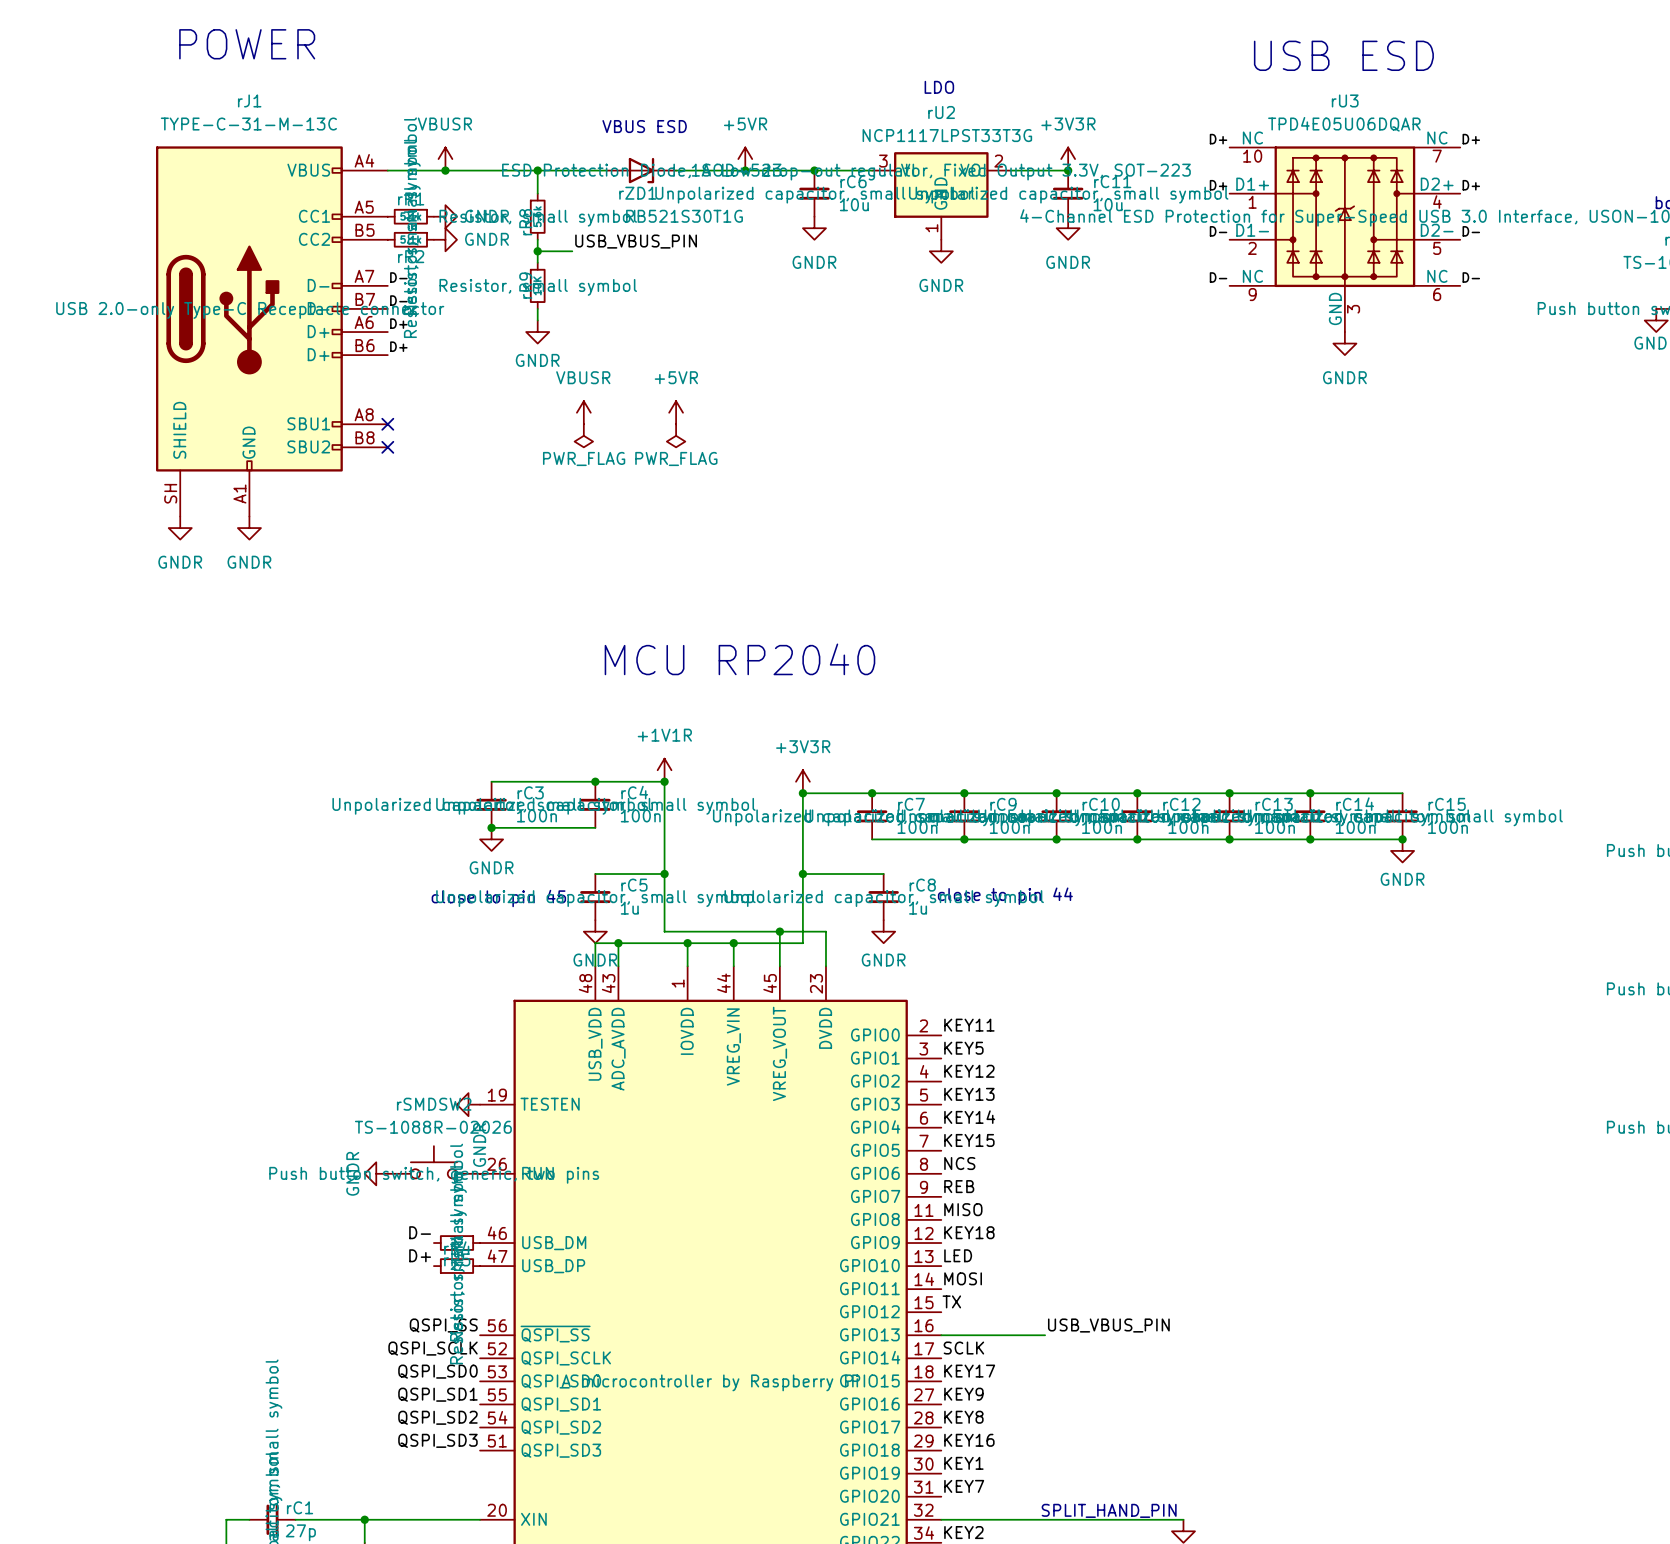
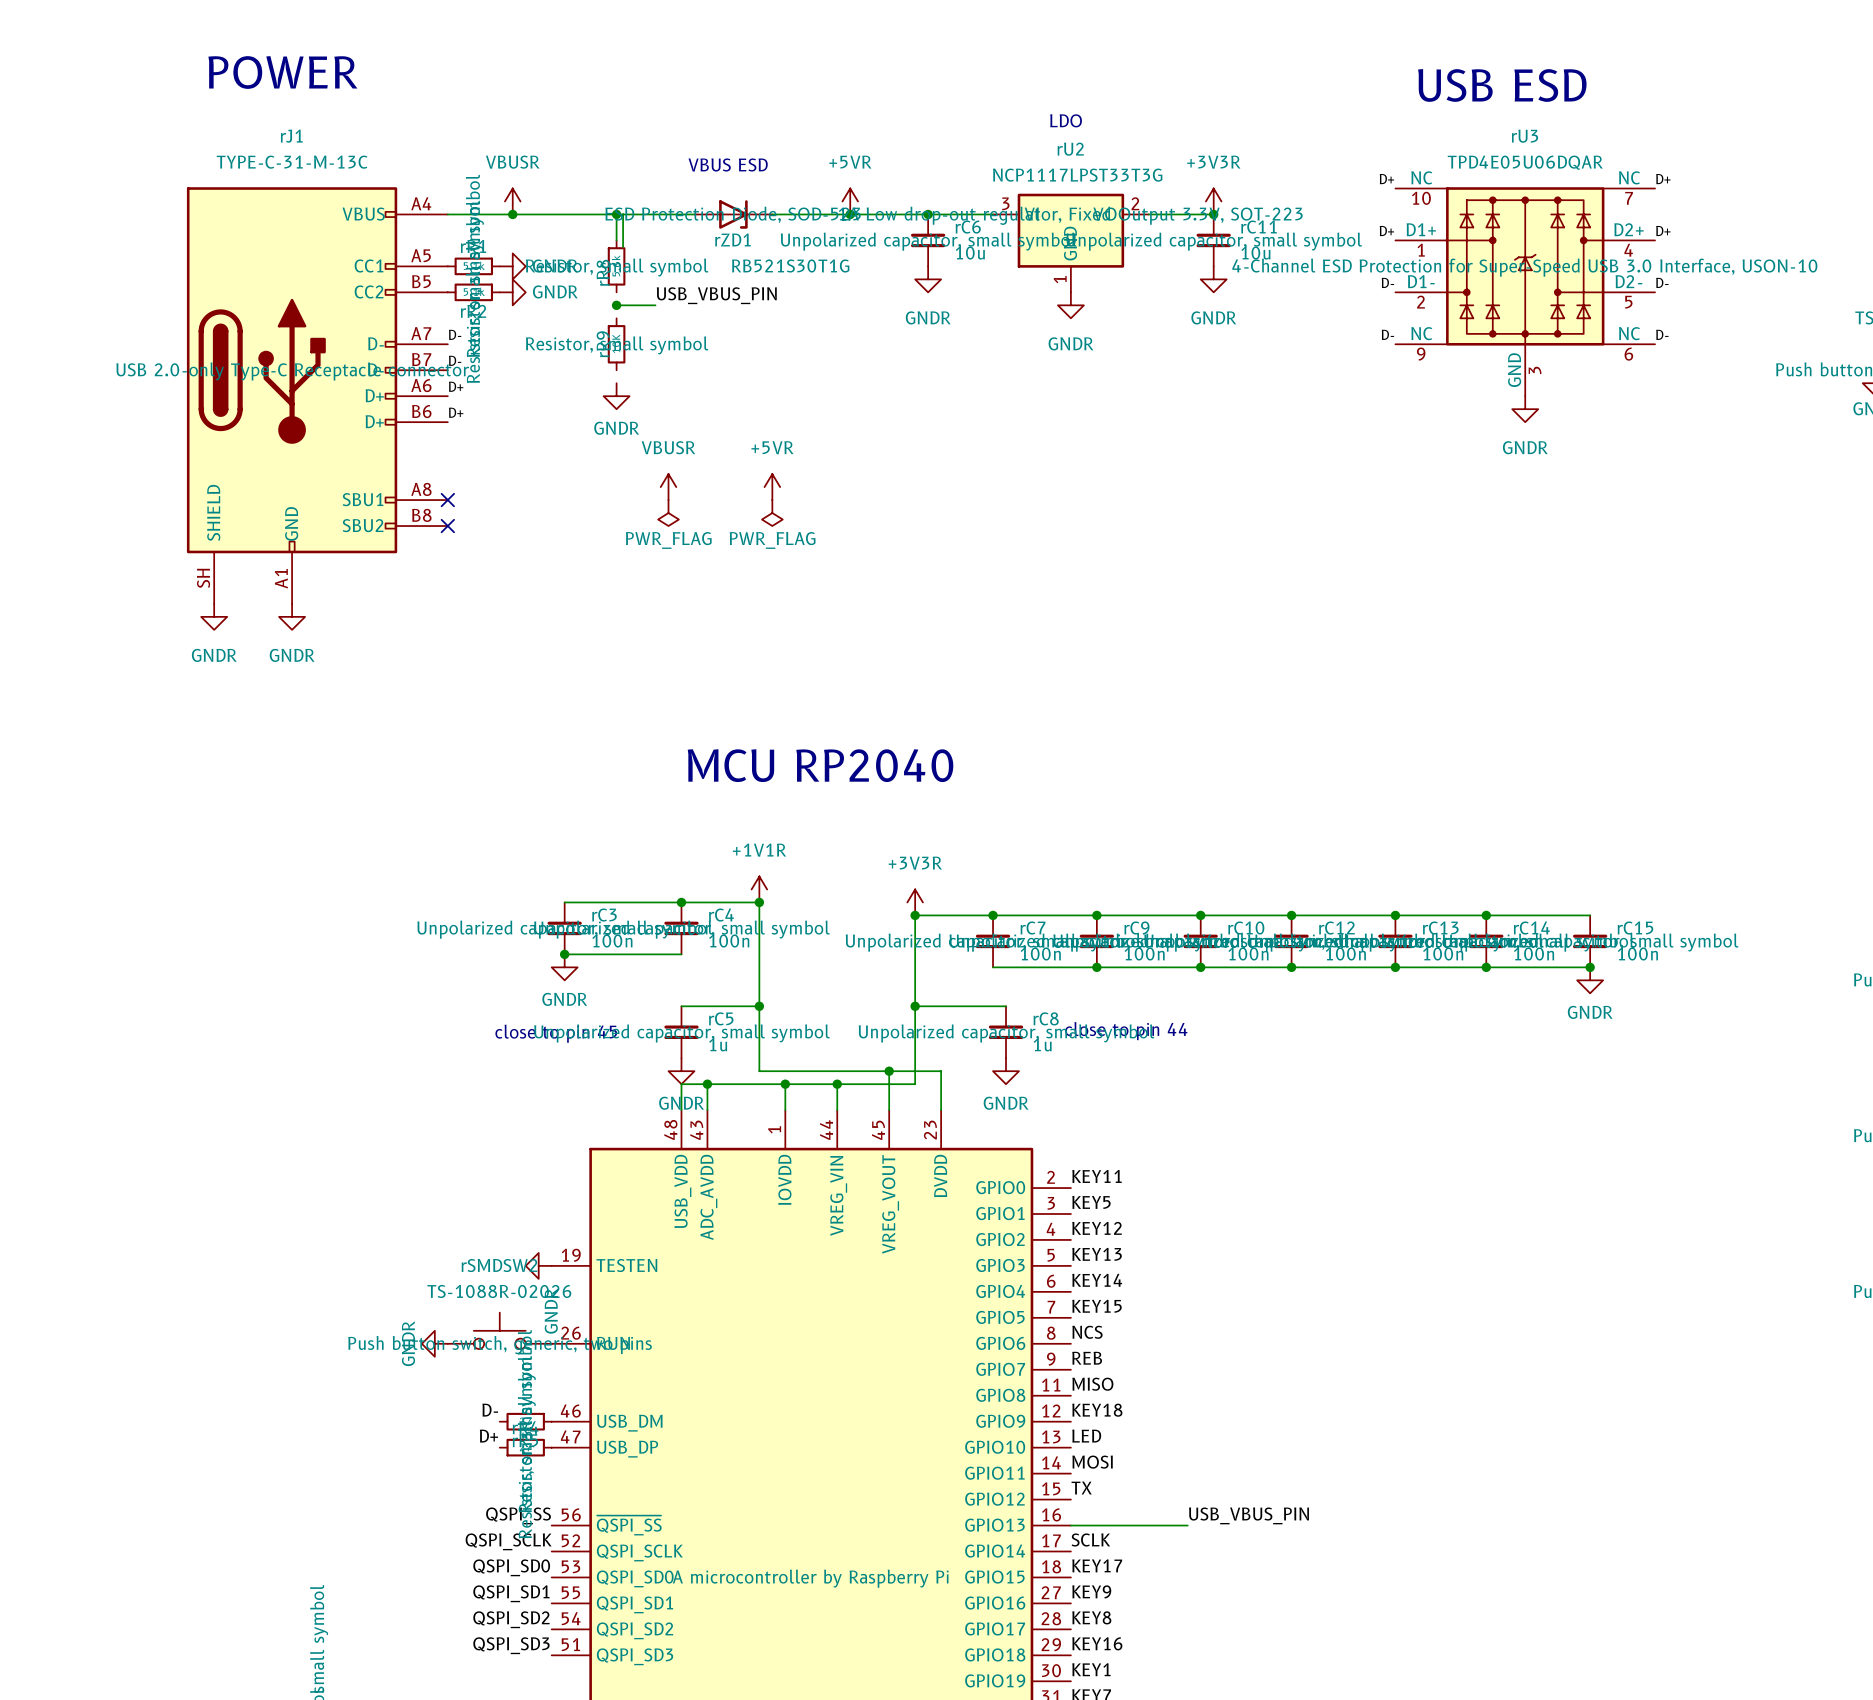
wire: none -> (623, 214) (623, 246)
wire: (537, 239) (537, 262) -> none
wire: (537, 308) (537, 320) -> none

